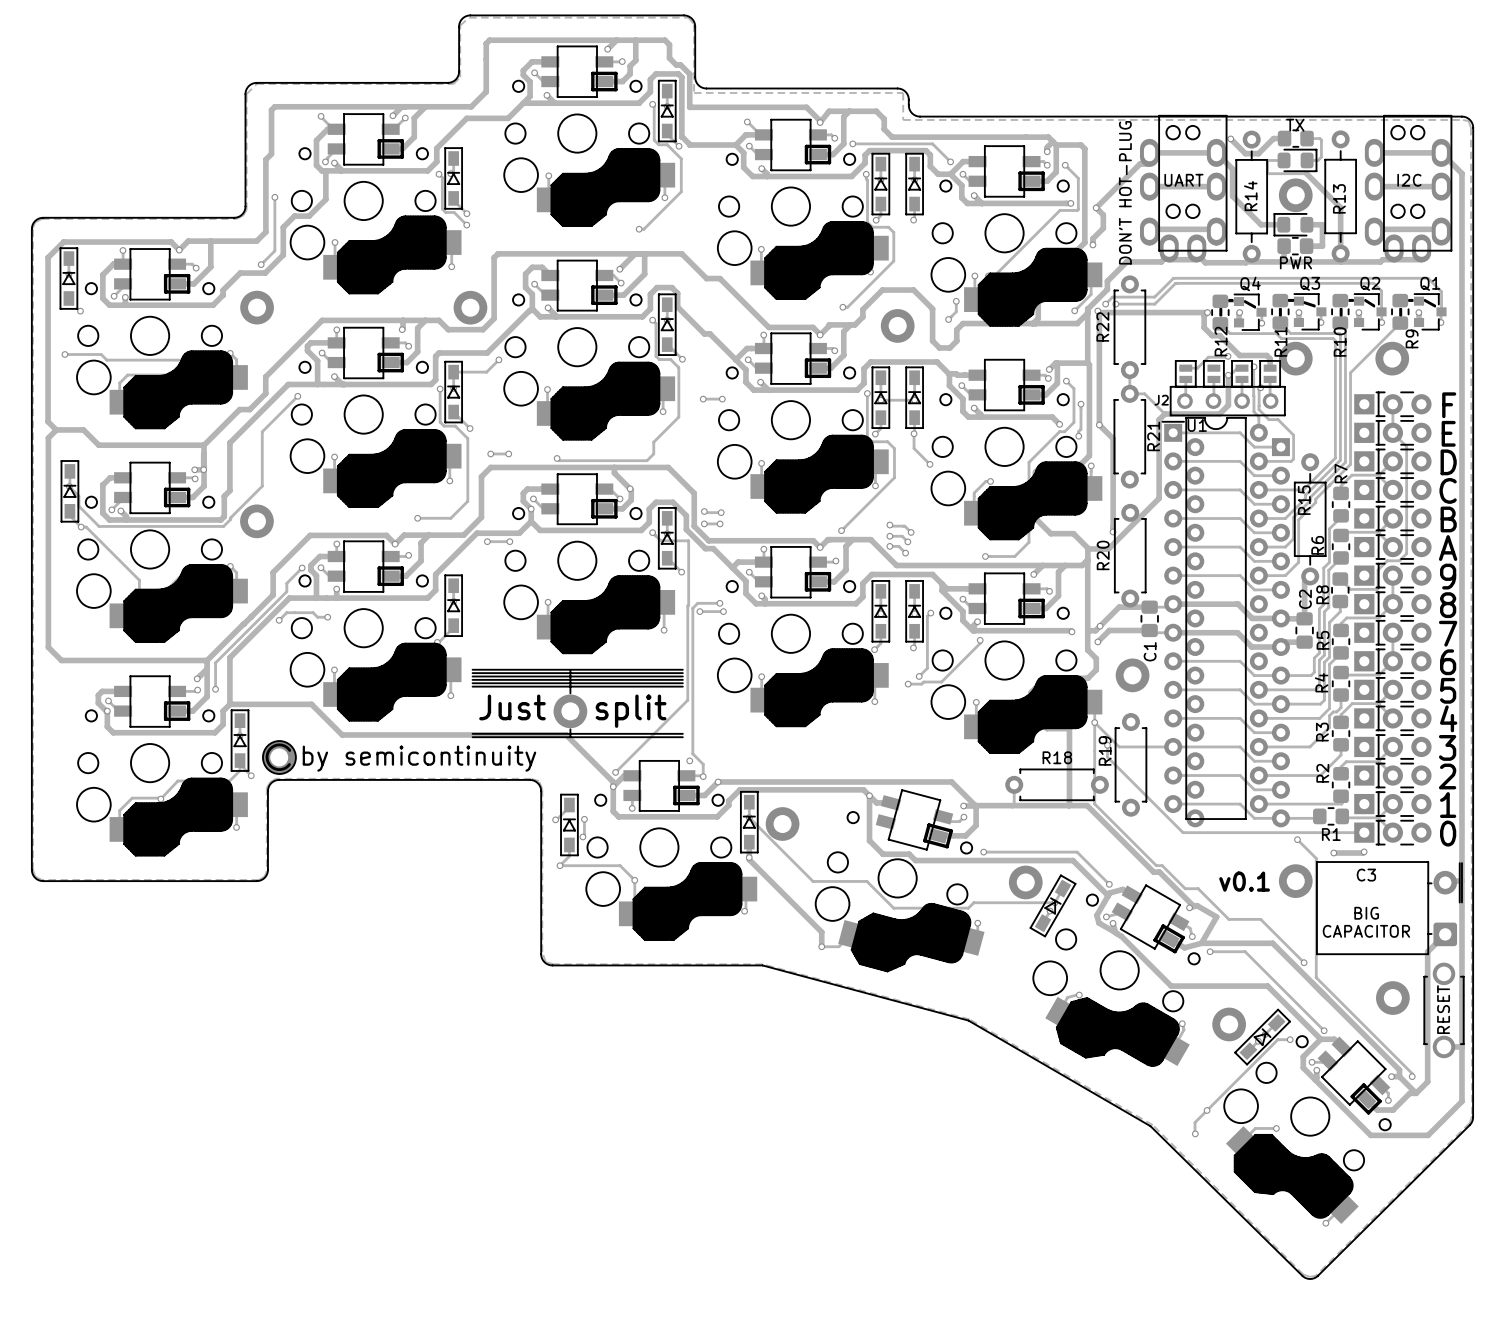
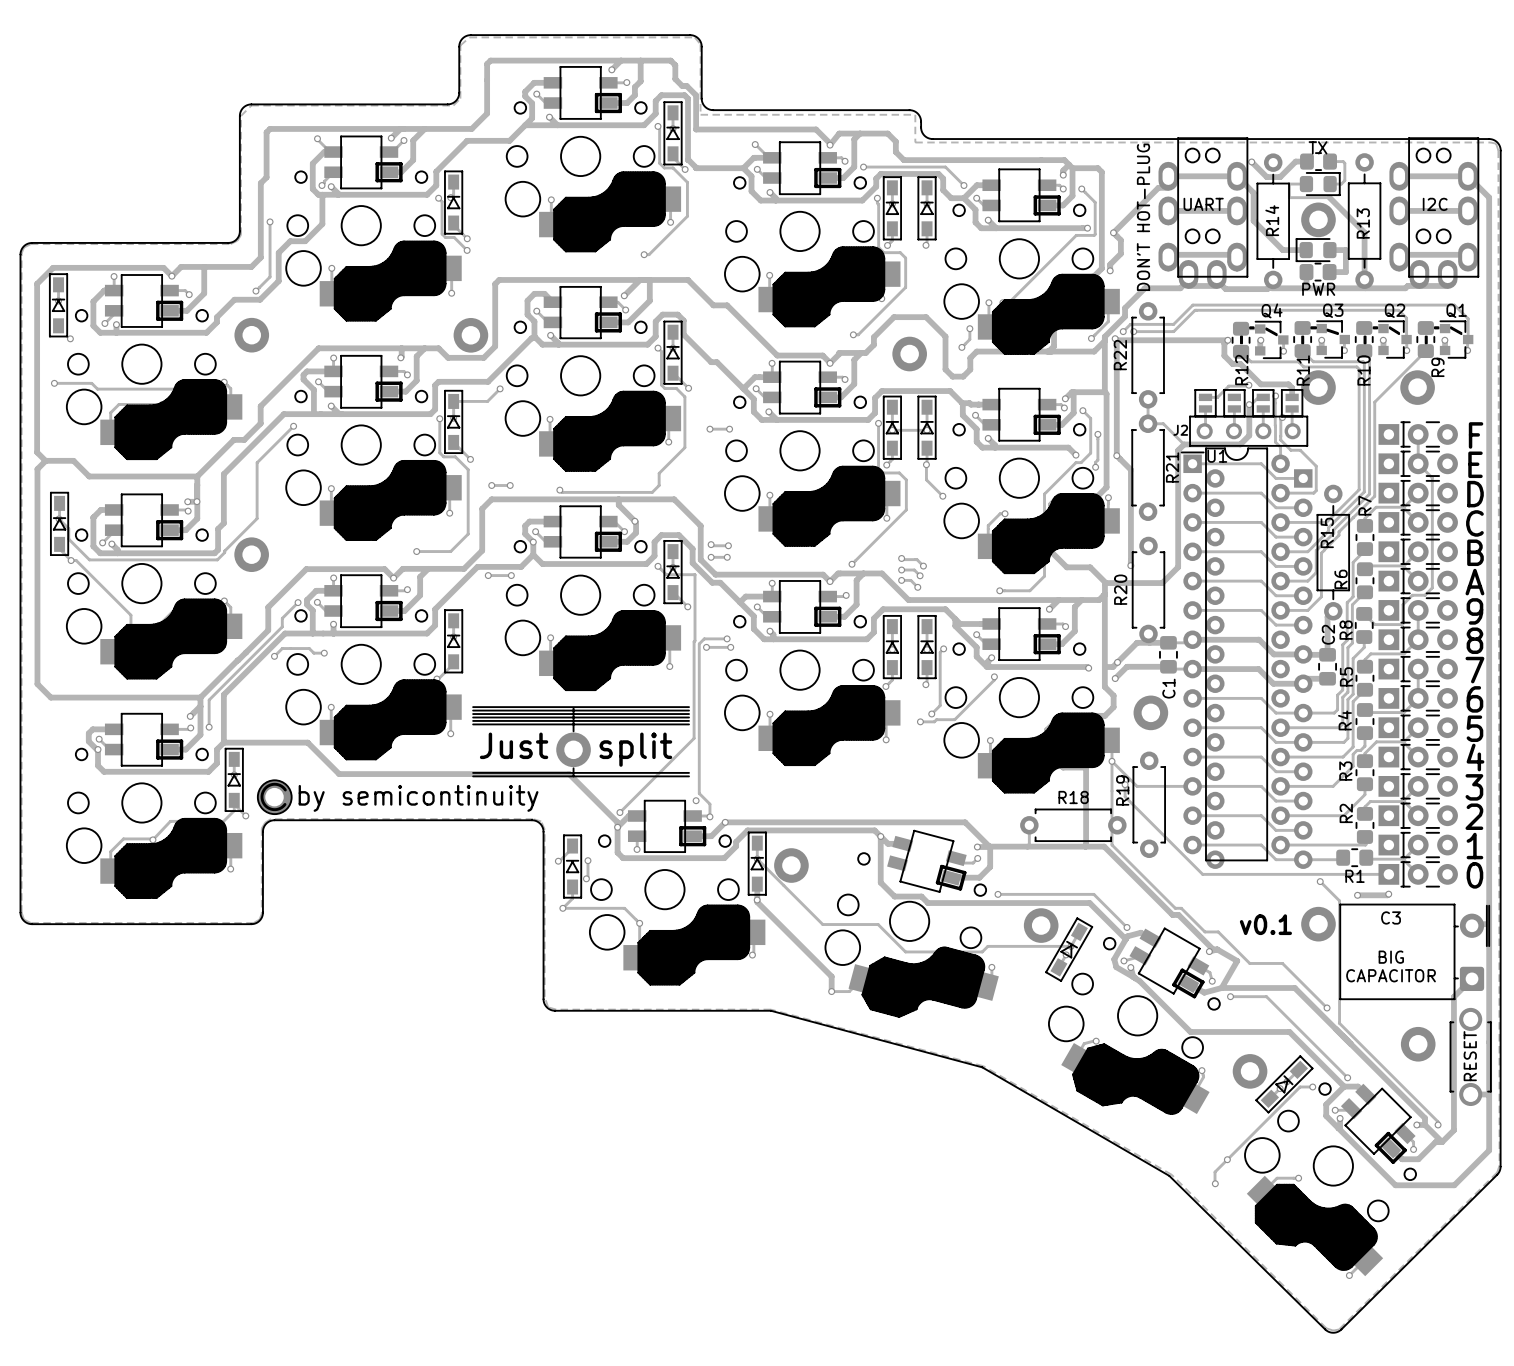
track: (1159, 498) (1108, 548) -> (1178, 531) (1178, 567) (1162, 583) (1126, 583)

